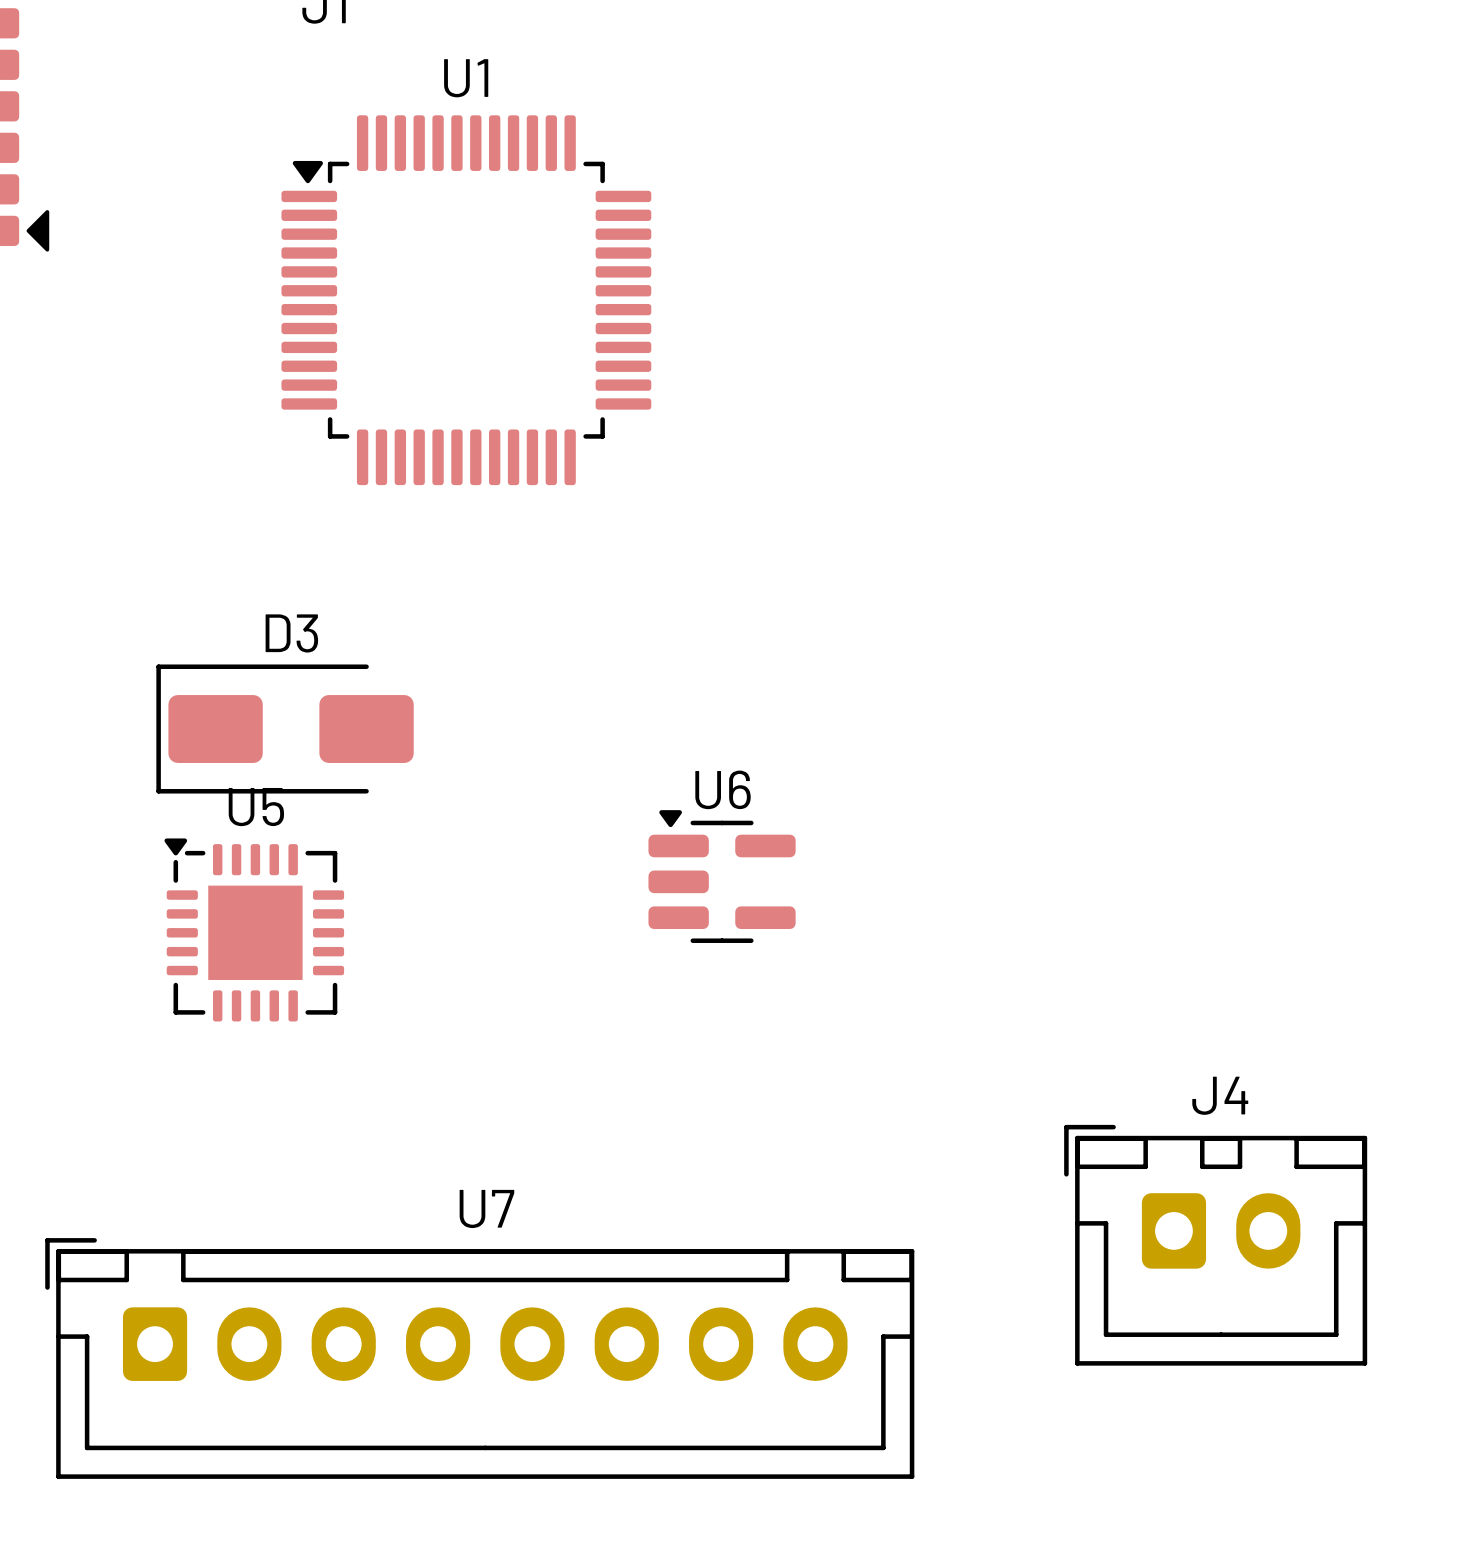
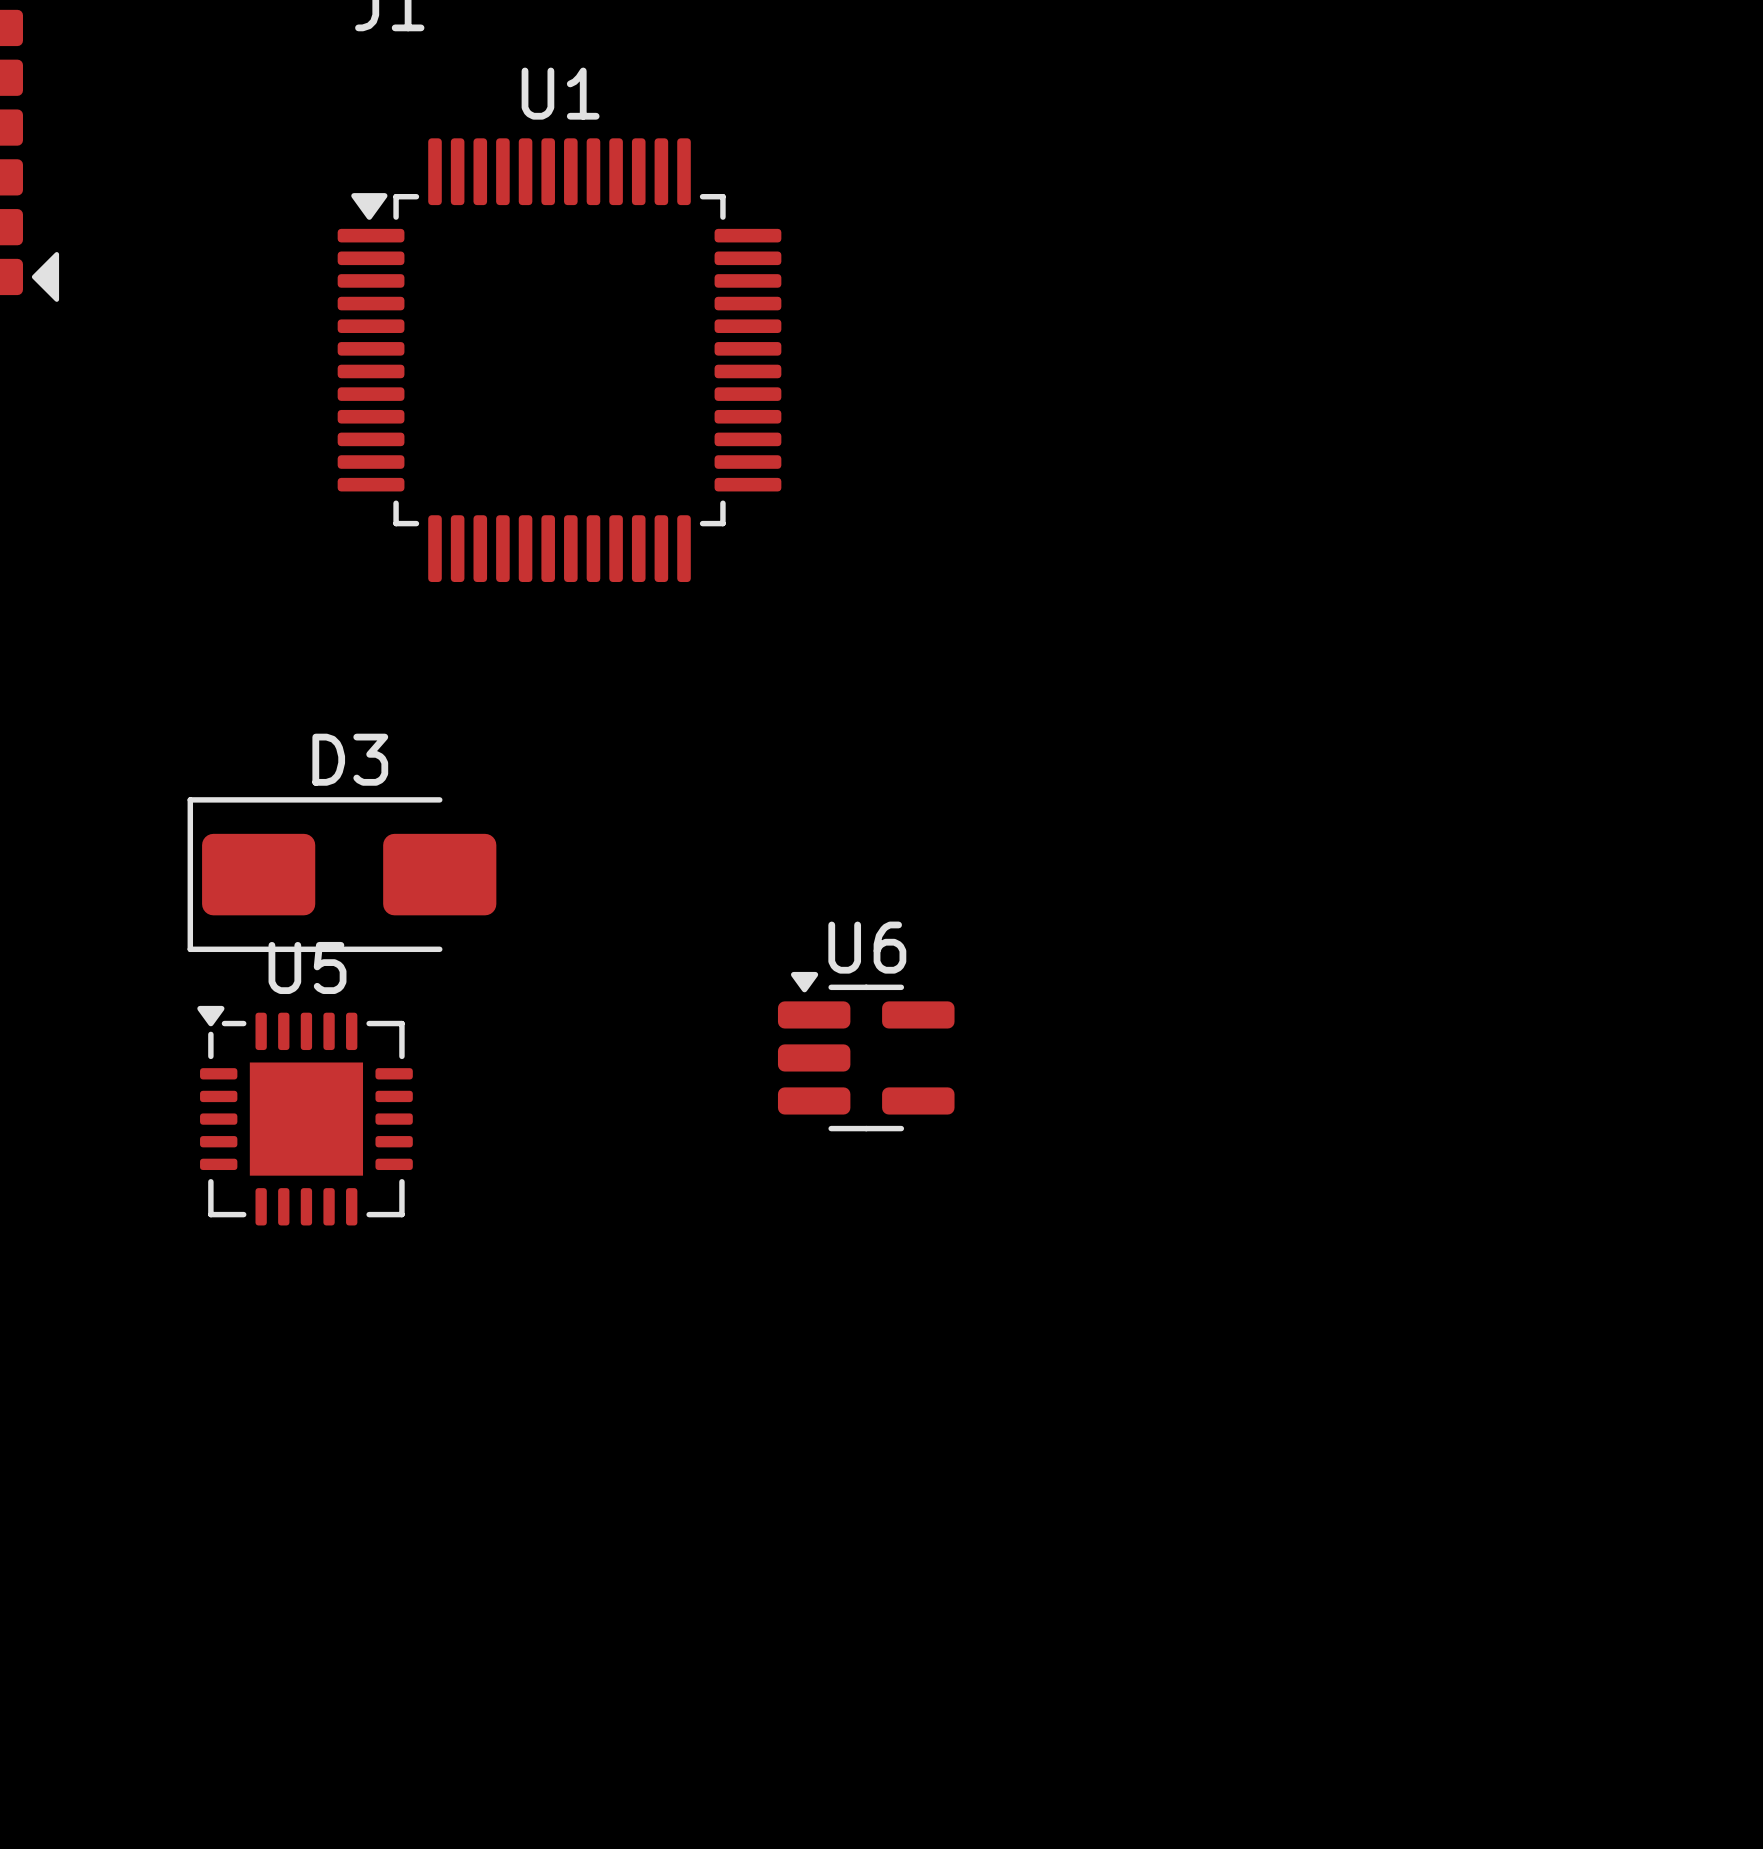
J4: (1215, 1245) -> none
U7: (479, 1358) -> none

